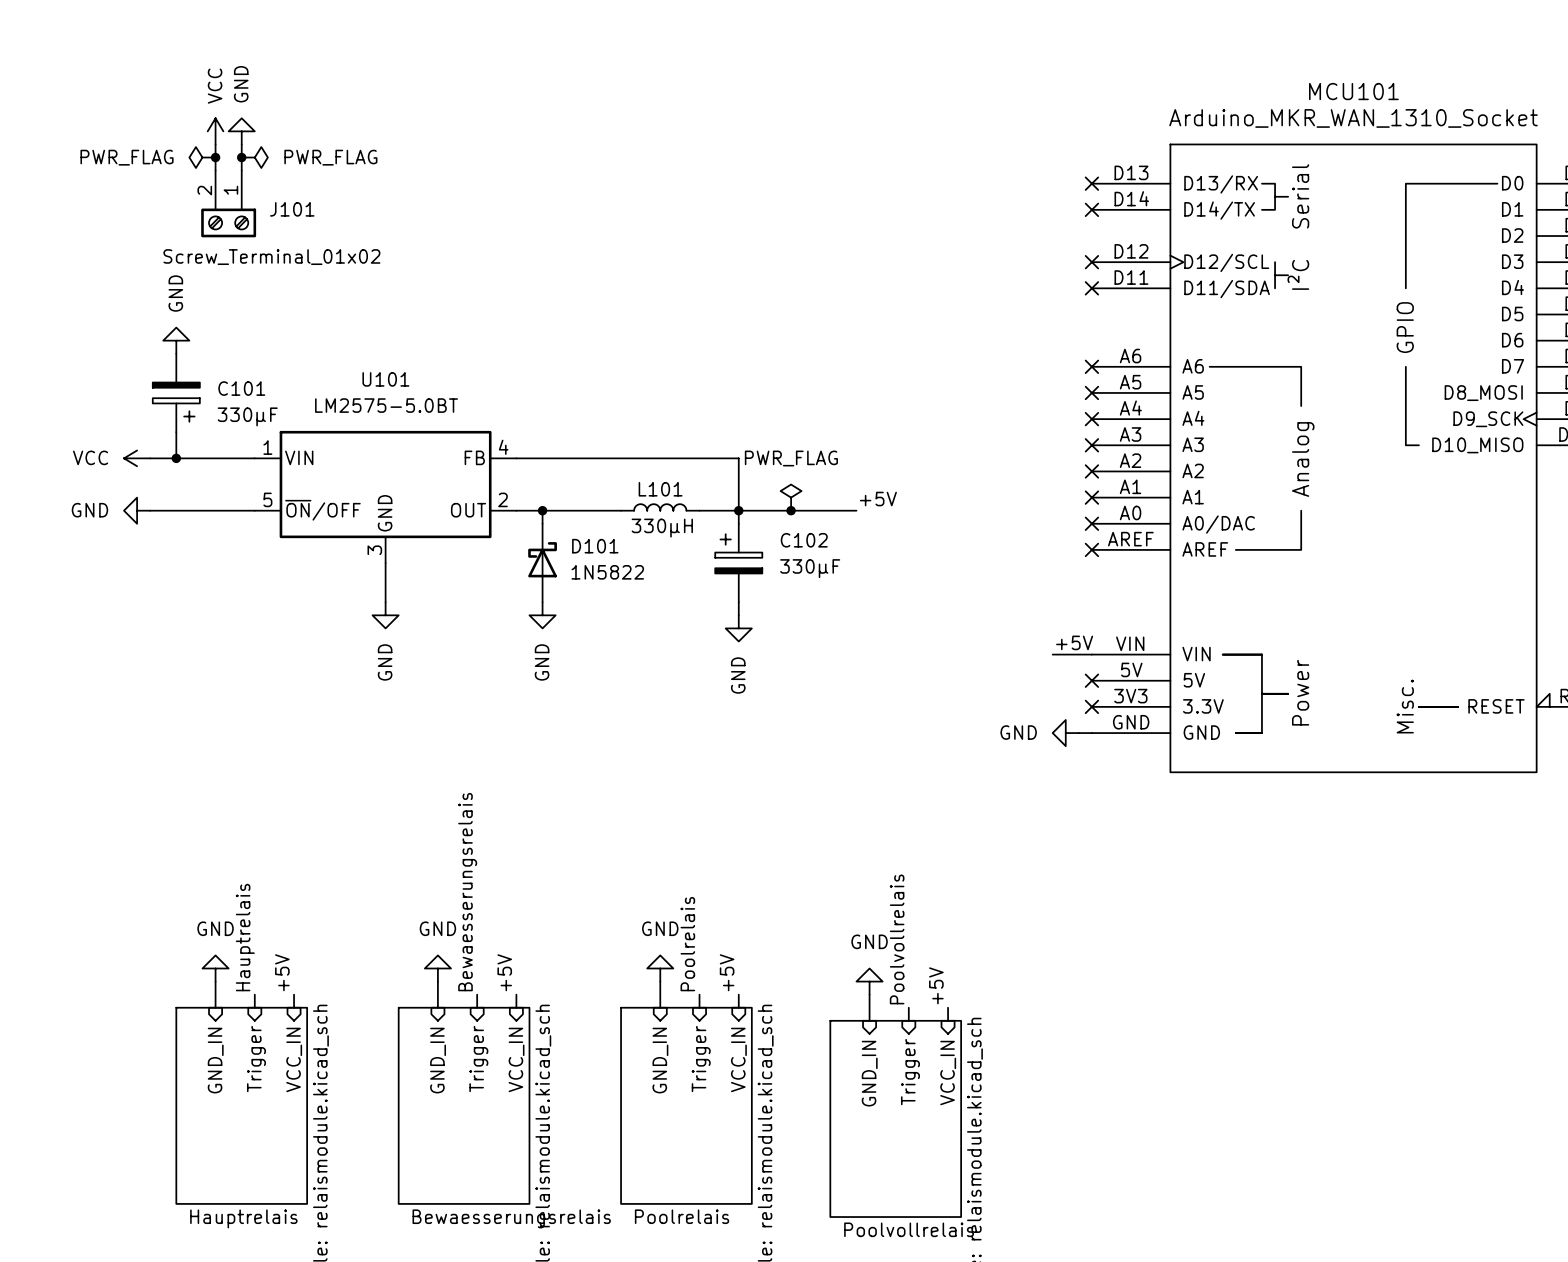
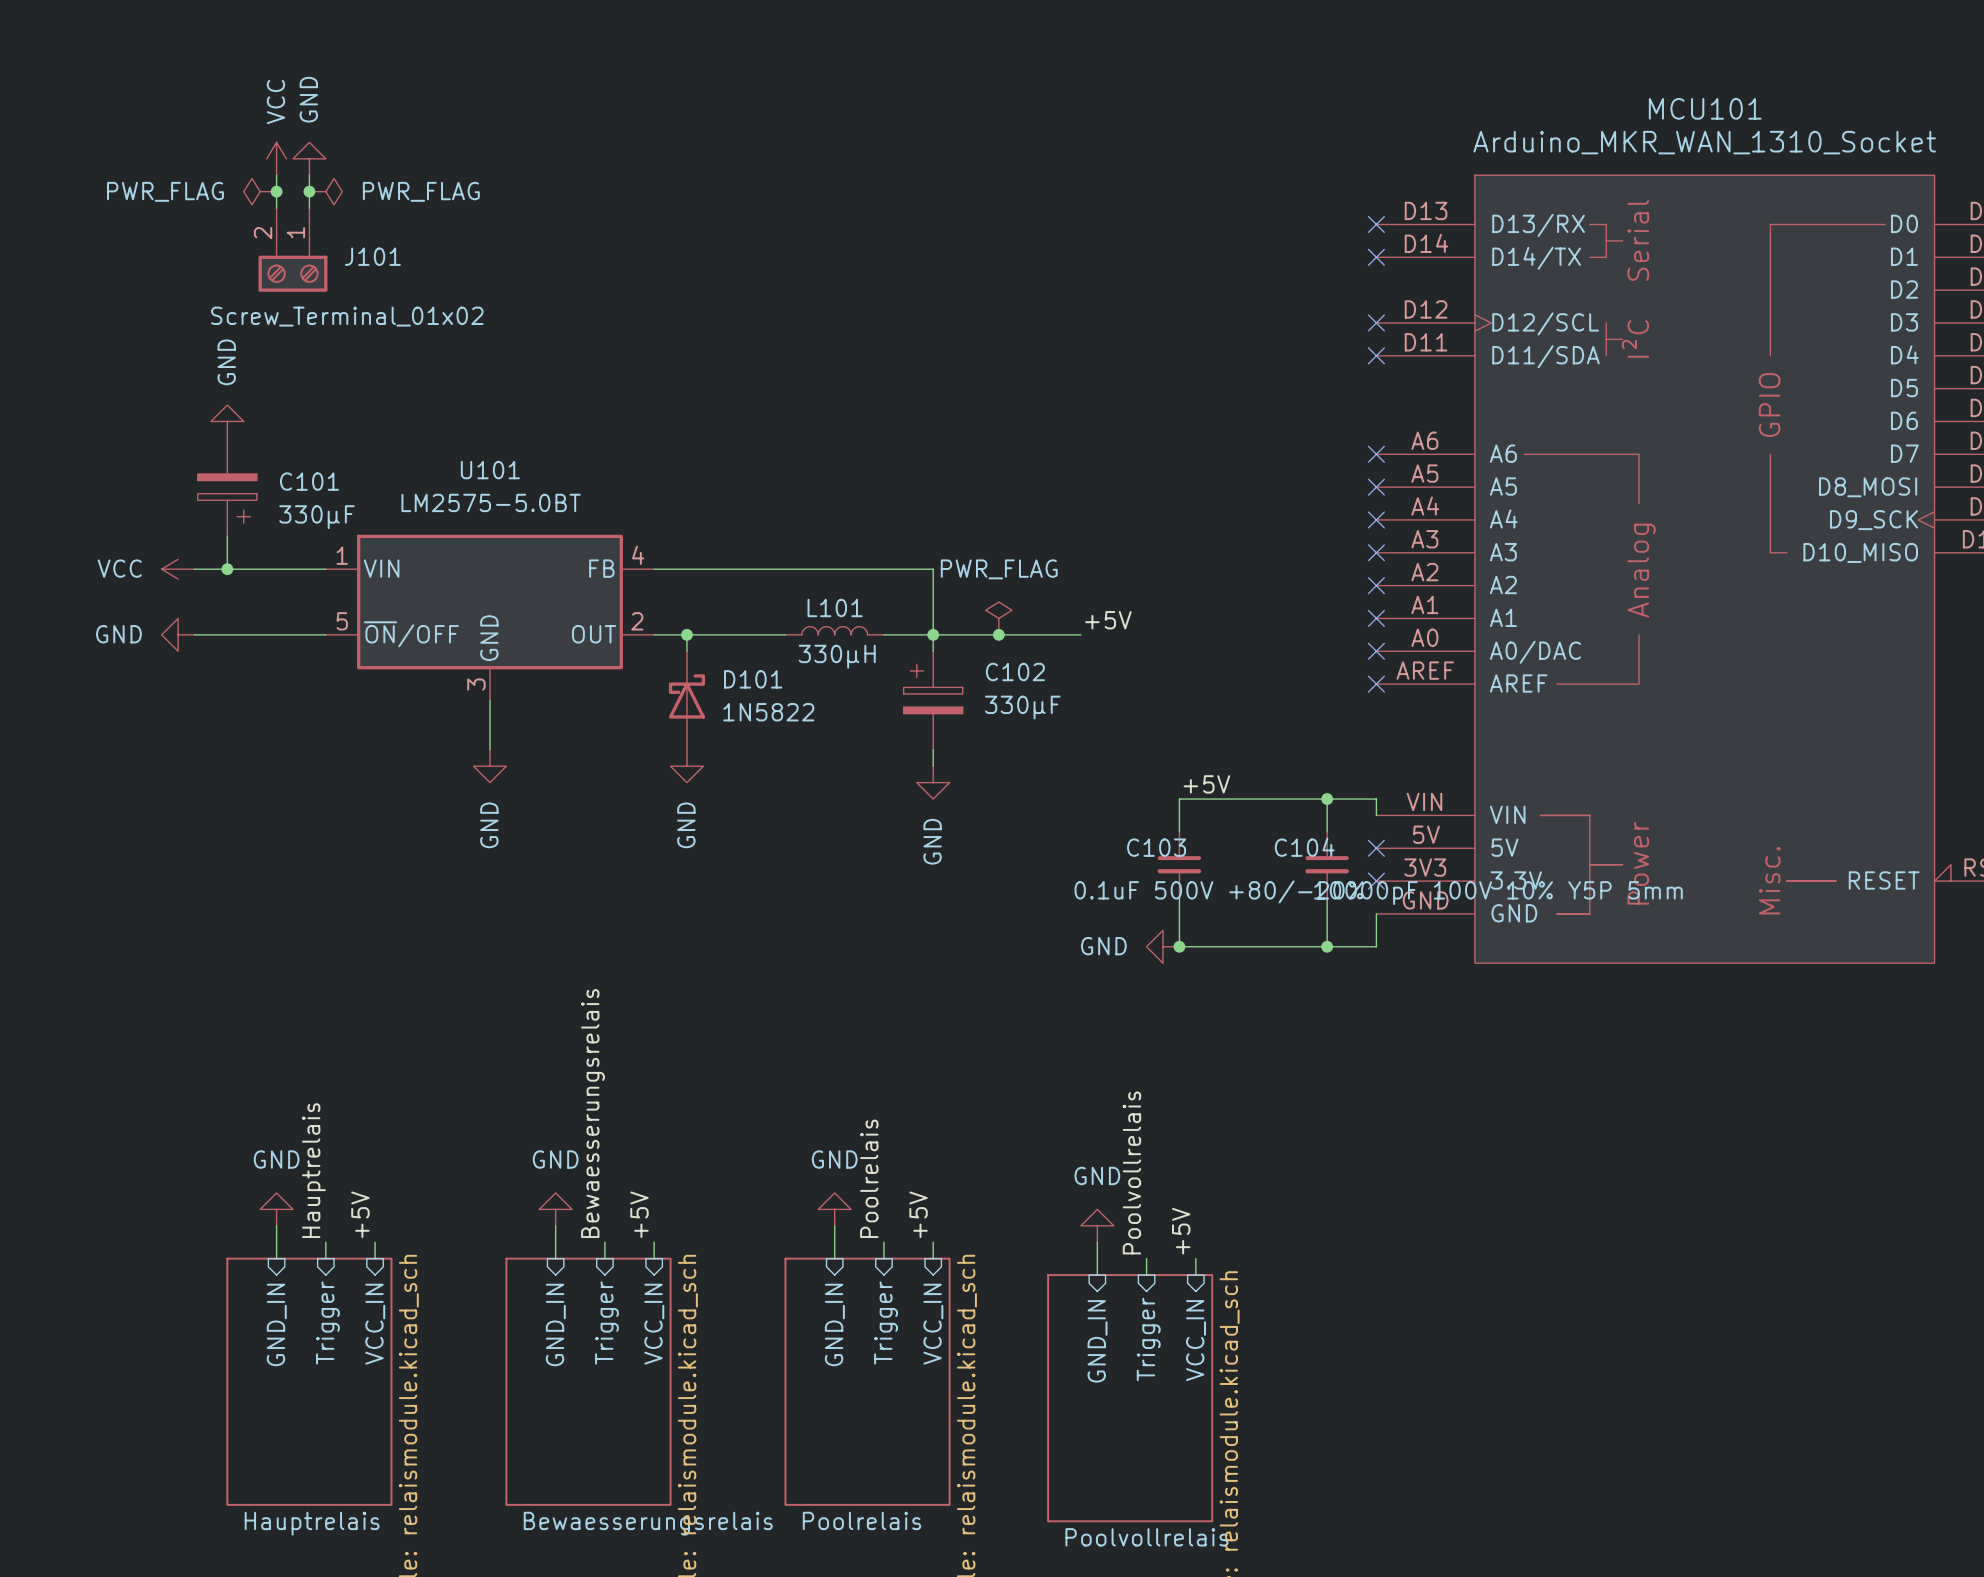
wire: none -> (1327, 799) (1327, 831)
junction: none -> (1327, 799)
label position: +5V (1074, 642) -> +5V (1206, 784)
wire: (1052, 654) (1091, 654) -> (1179, 831) (1179, 799) (1376, 799) (1376, 815)
C103: none -> 0.1uF 500V +80/-20% (1179, 864)
C104: none -> 10000pF 100V 10% Y5P 5mm (1327, 864)
wire: none -> (1327, 897) (1327, 946)
power symbol position: GND (1065, 733) -> GND (1163, 946)
wire: (1078, 733) (1091, 733) -> (1179, 897) (1179, 946) (1376, 946) (1376, 913)
junction: none -> (1179, 946)
junction: none -> (1327, 946)

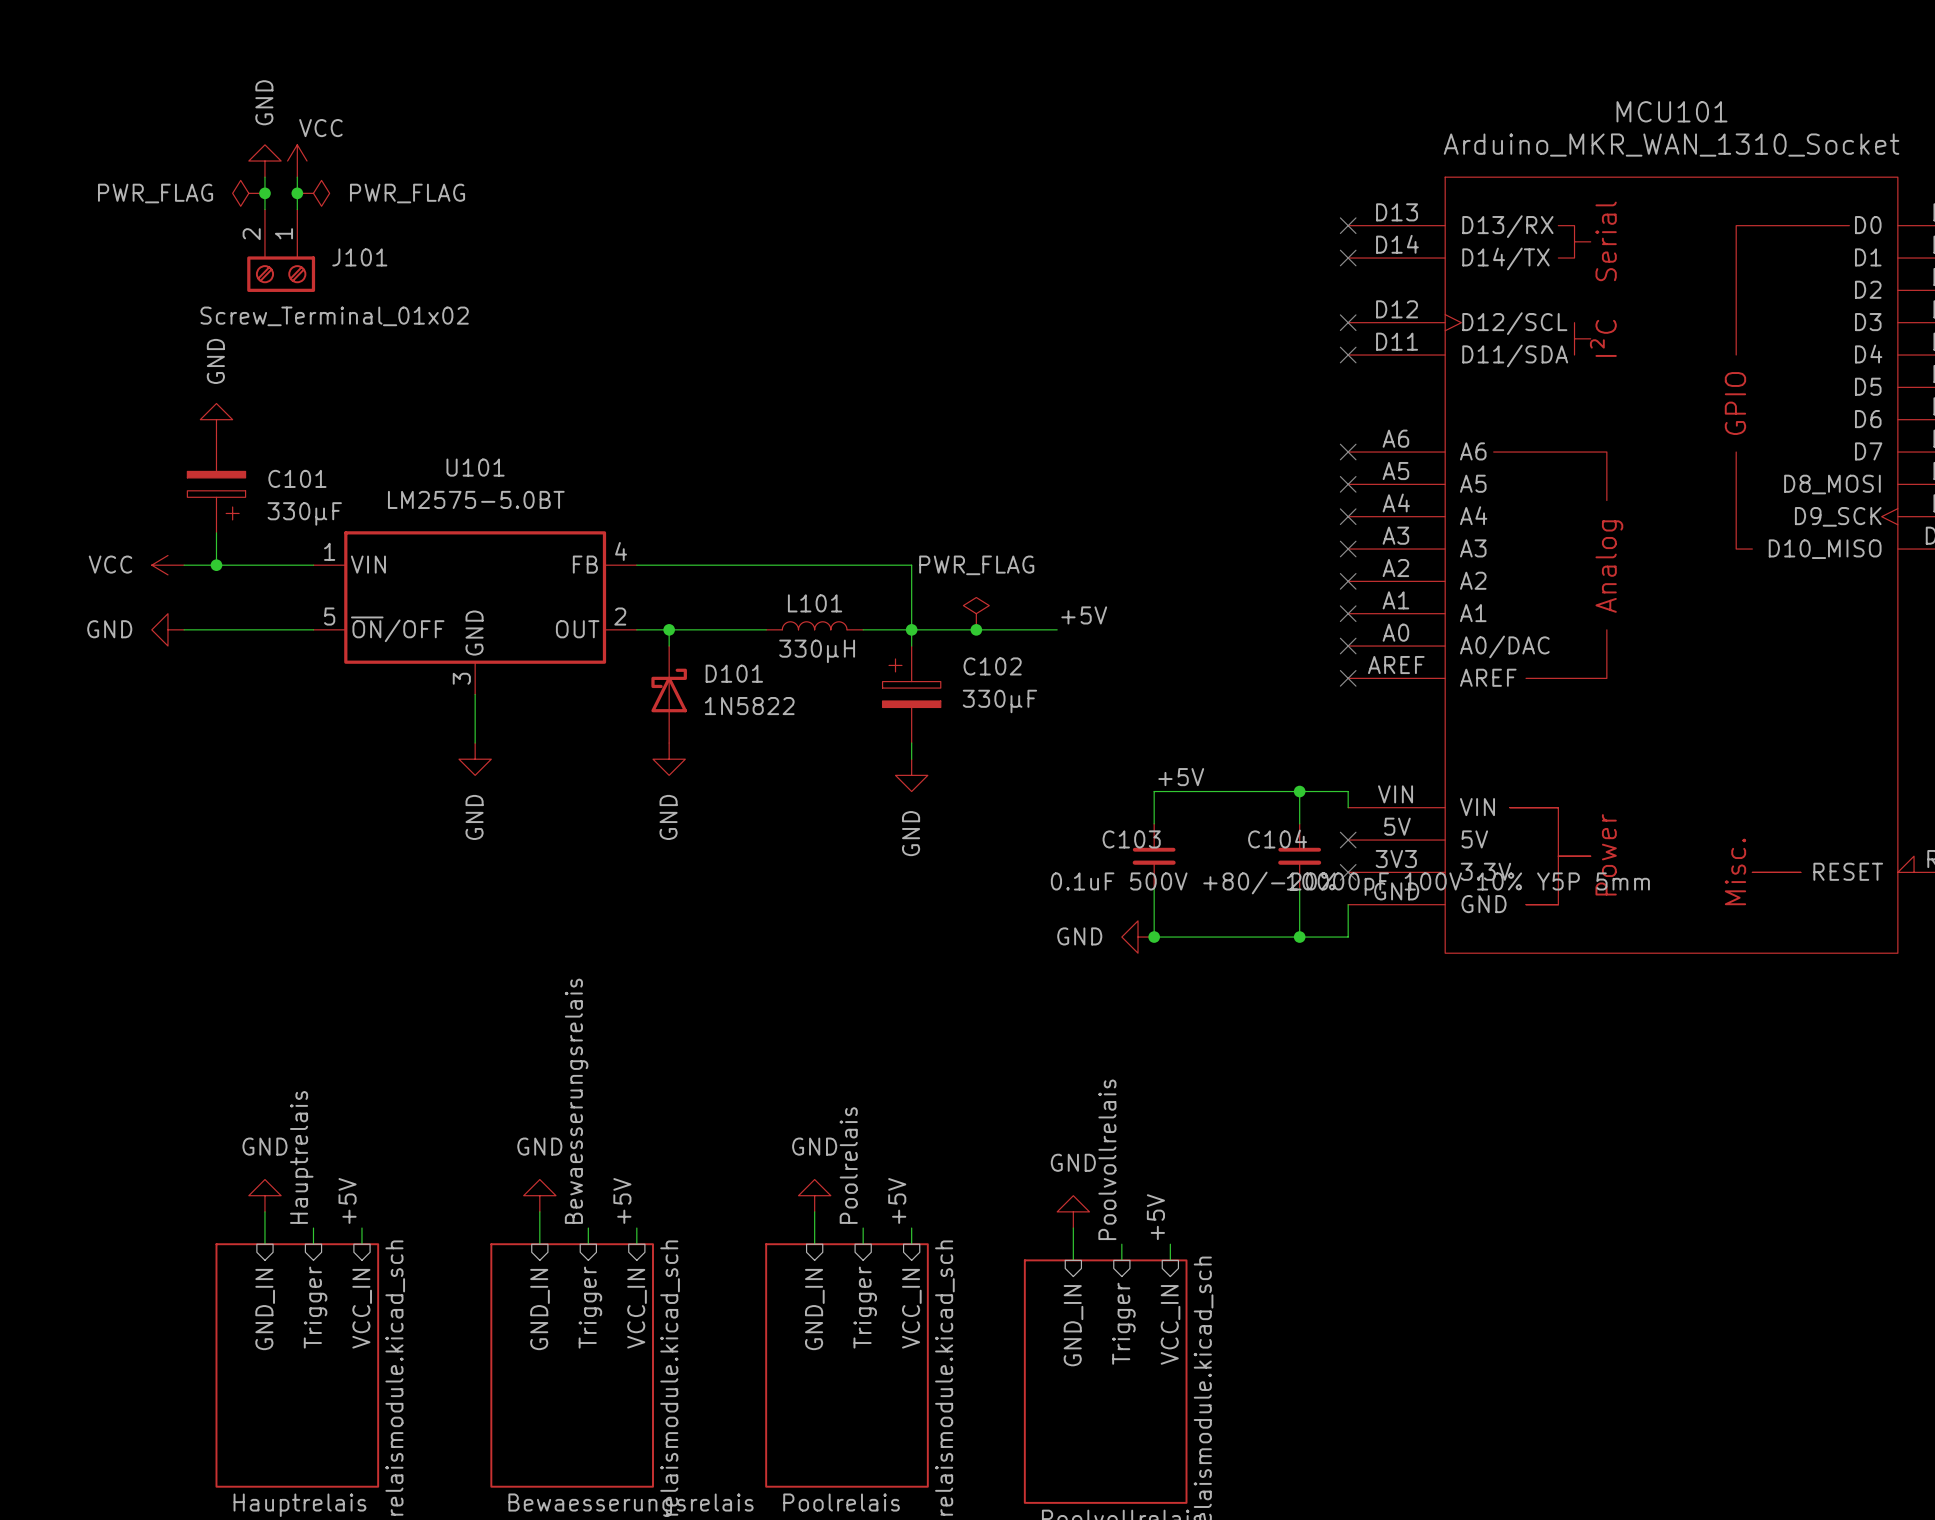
power symbol: VCC (276, 158) -> GND (264, 161)
power symbol: GND (309, 158) -> VCC (297, 161)

